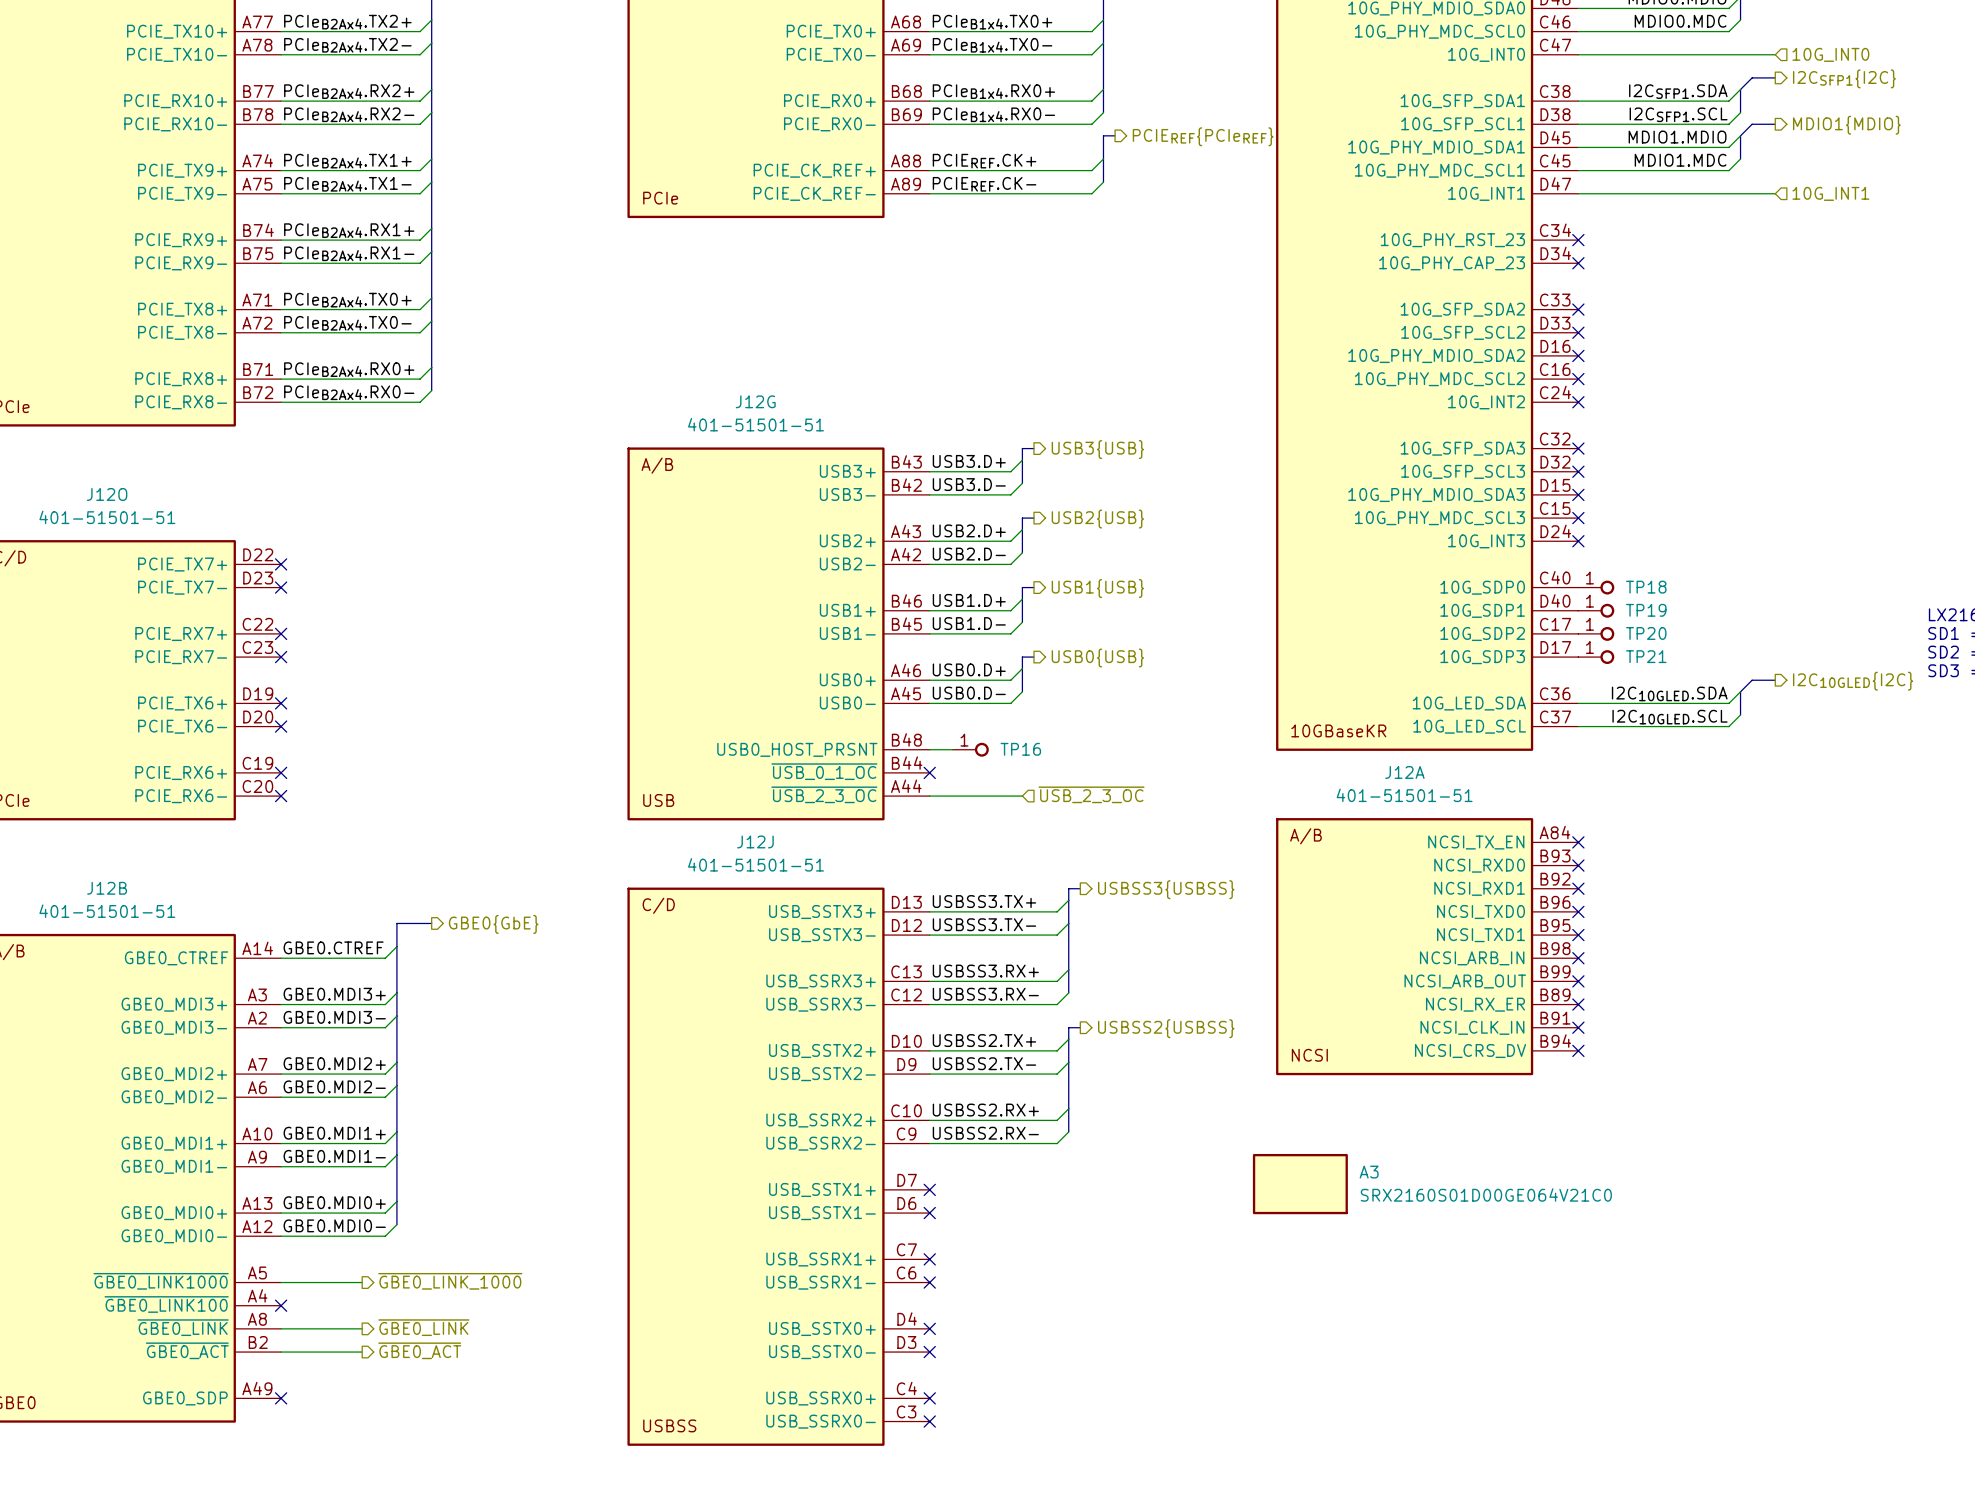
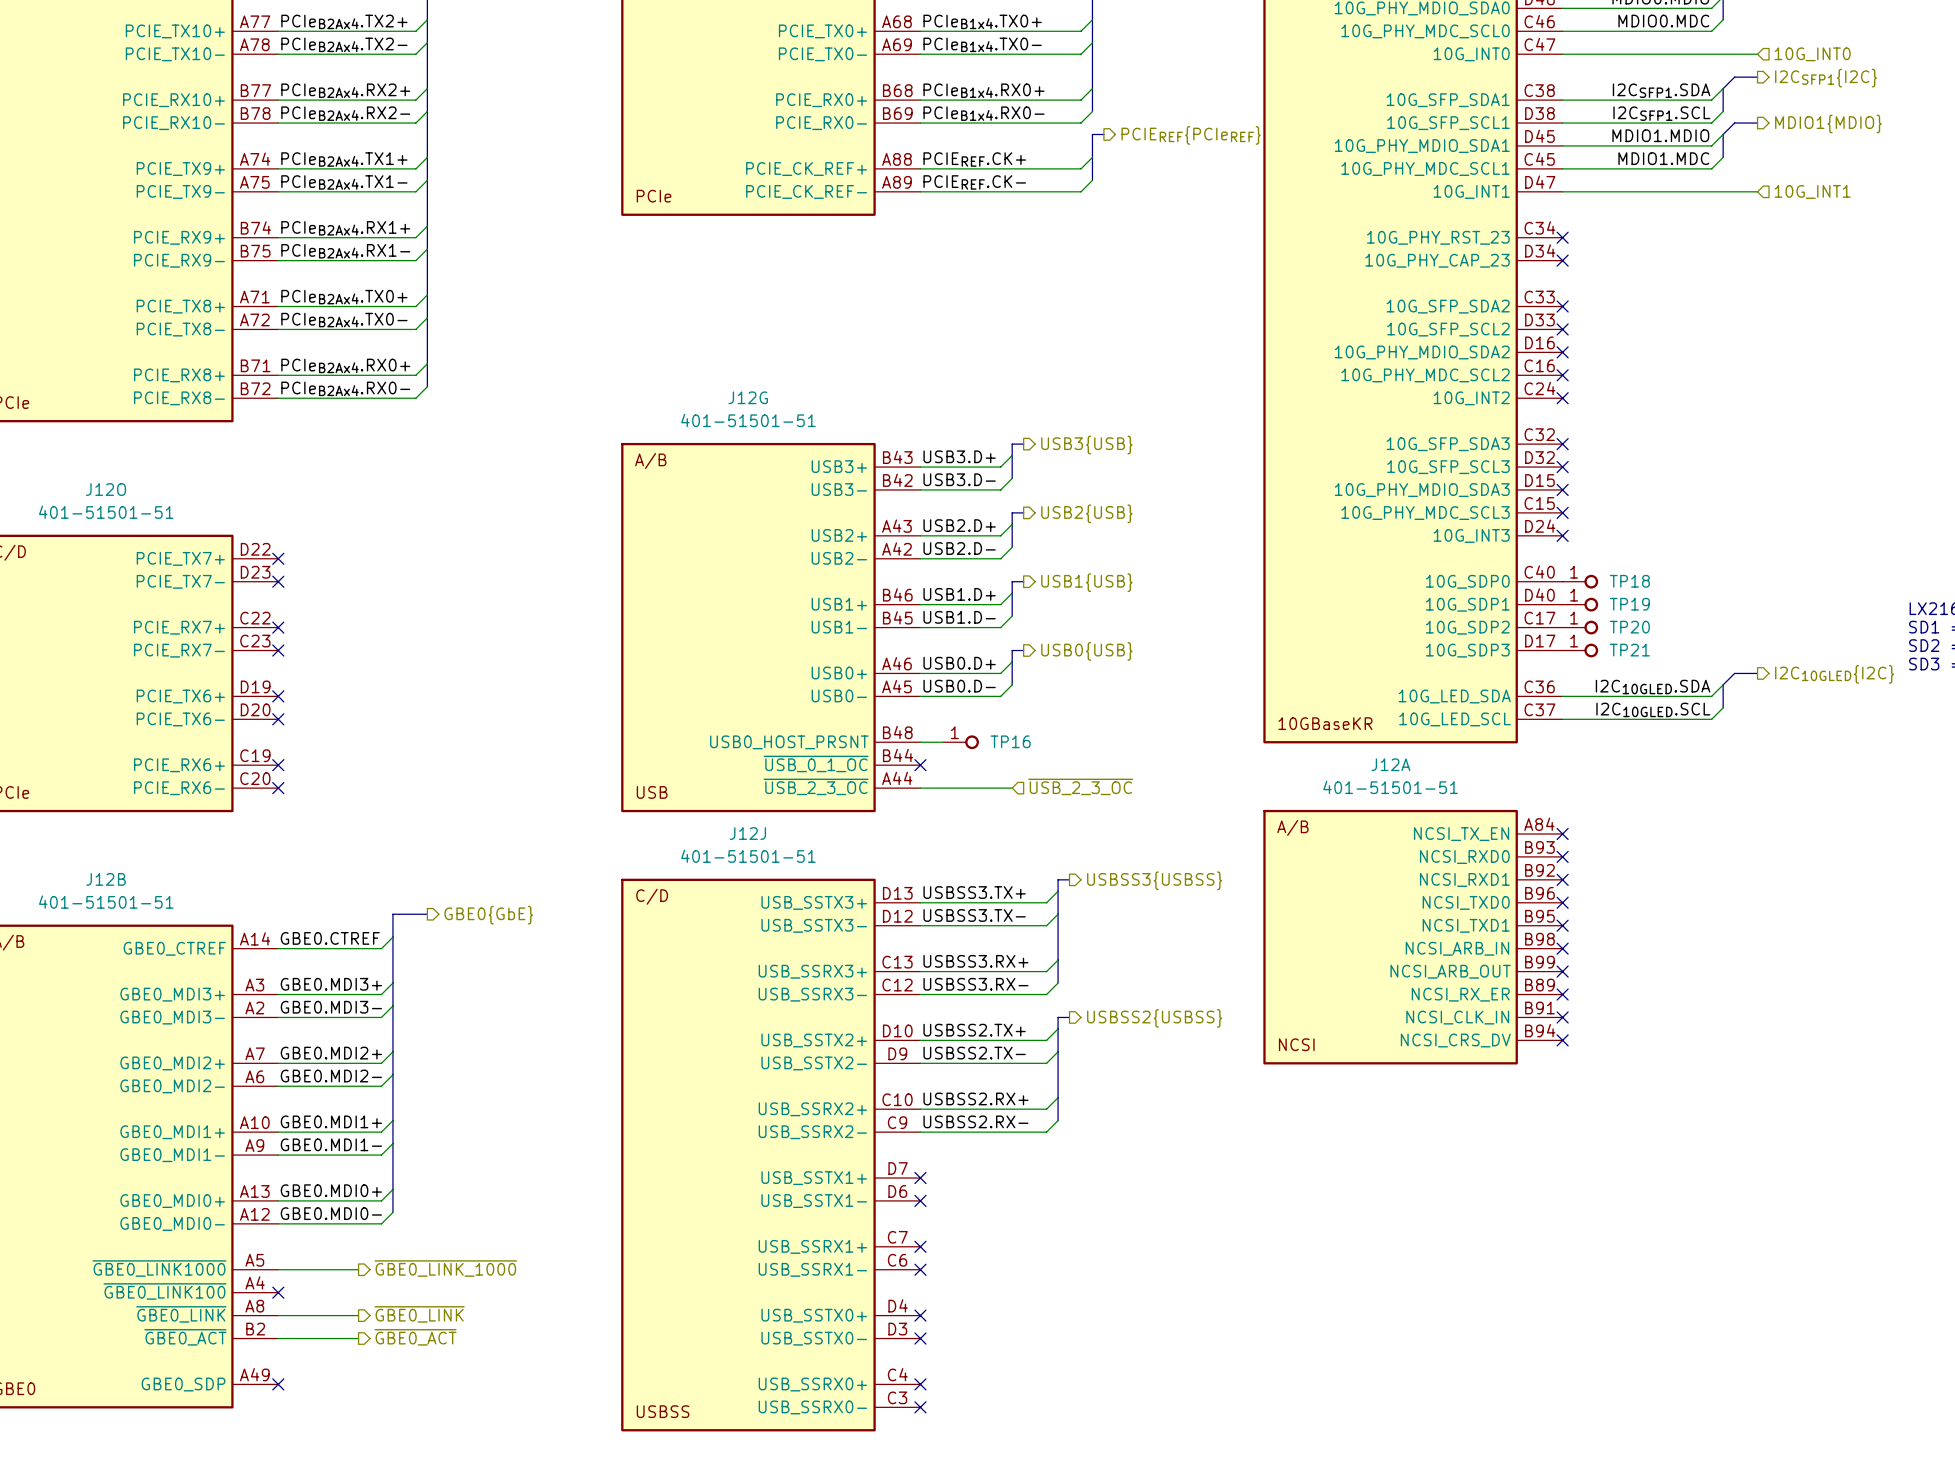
A3: (1300, 1184) -> none

